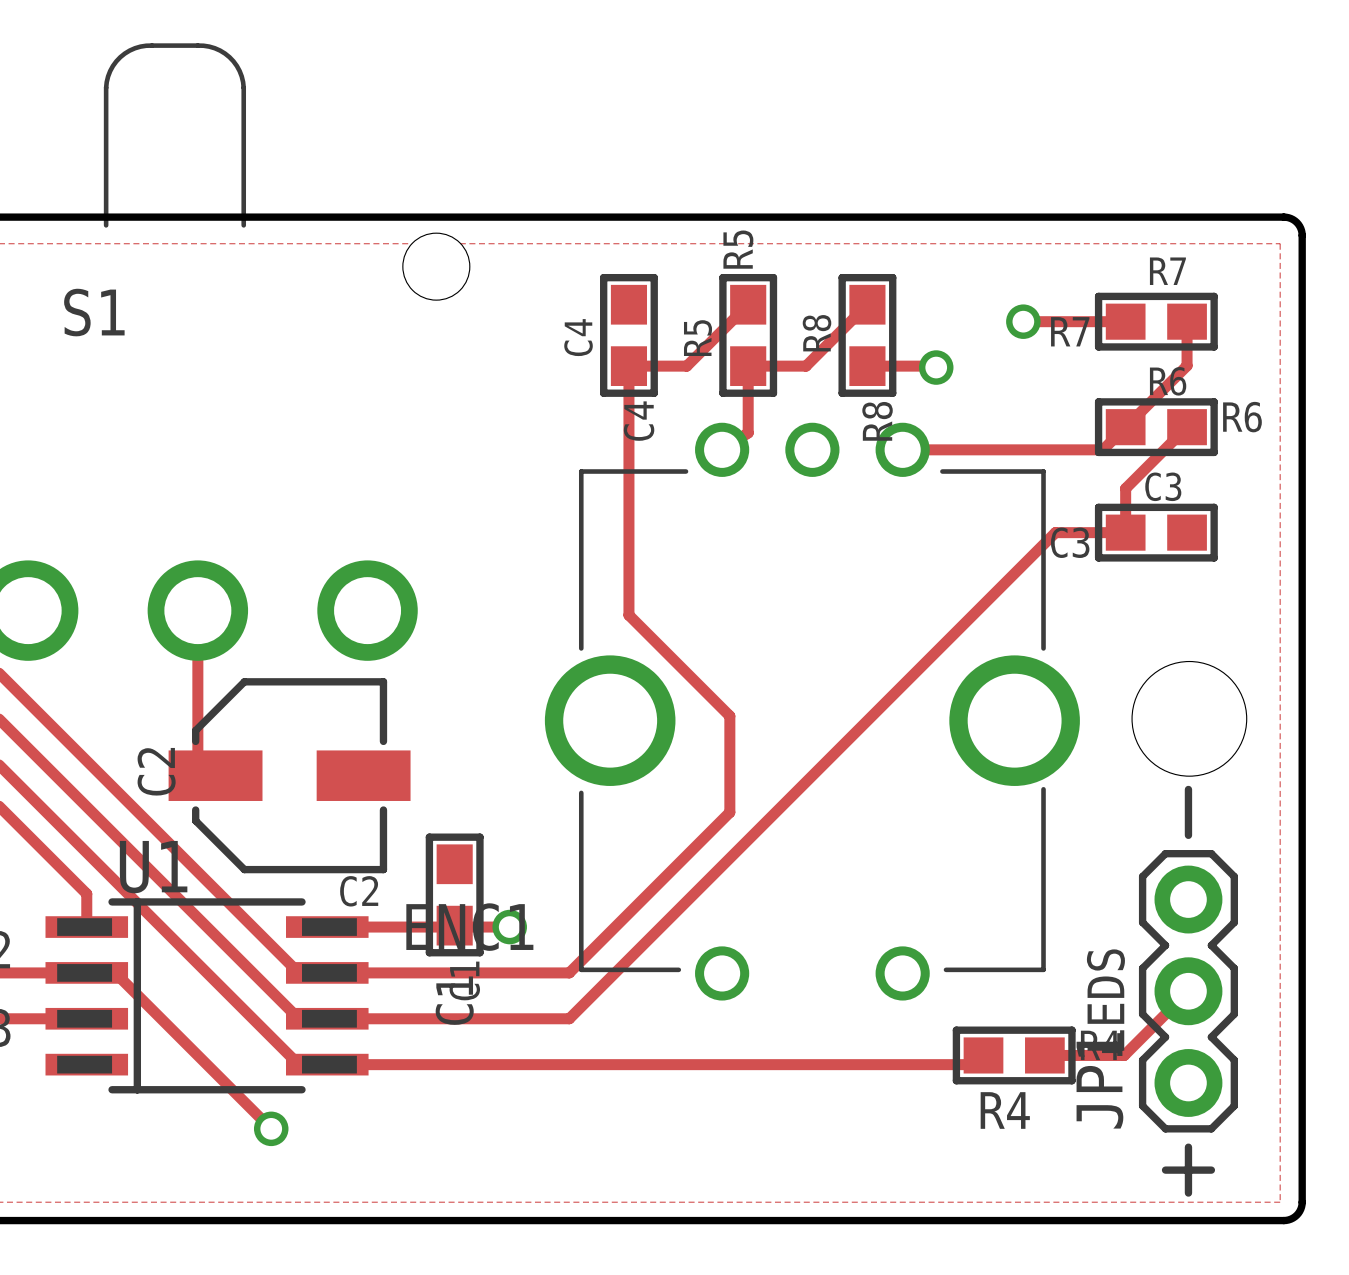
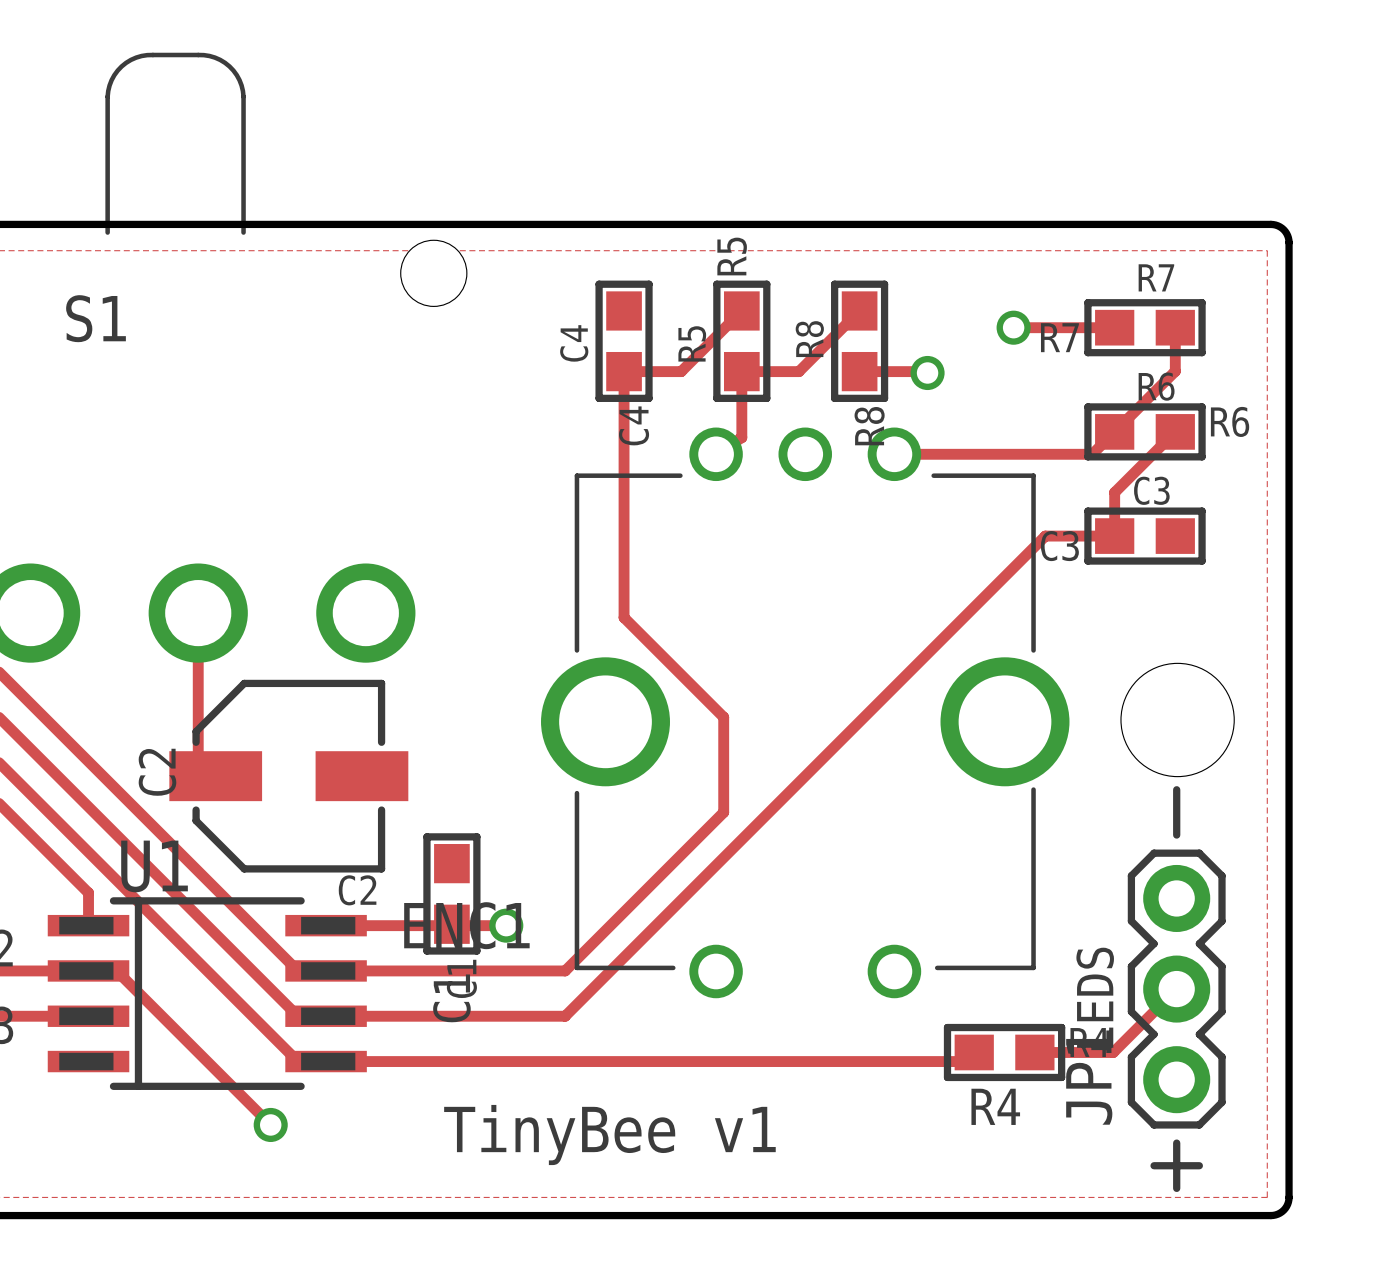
text: none -> TinyBee v1 (609, 1135)

